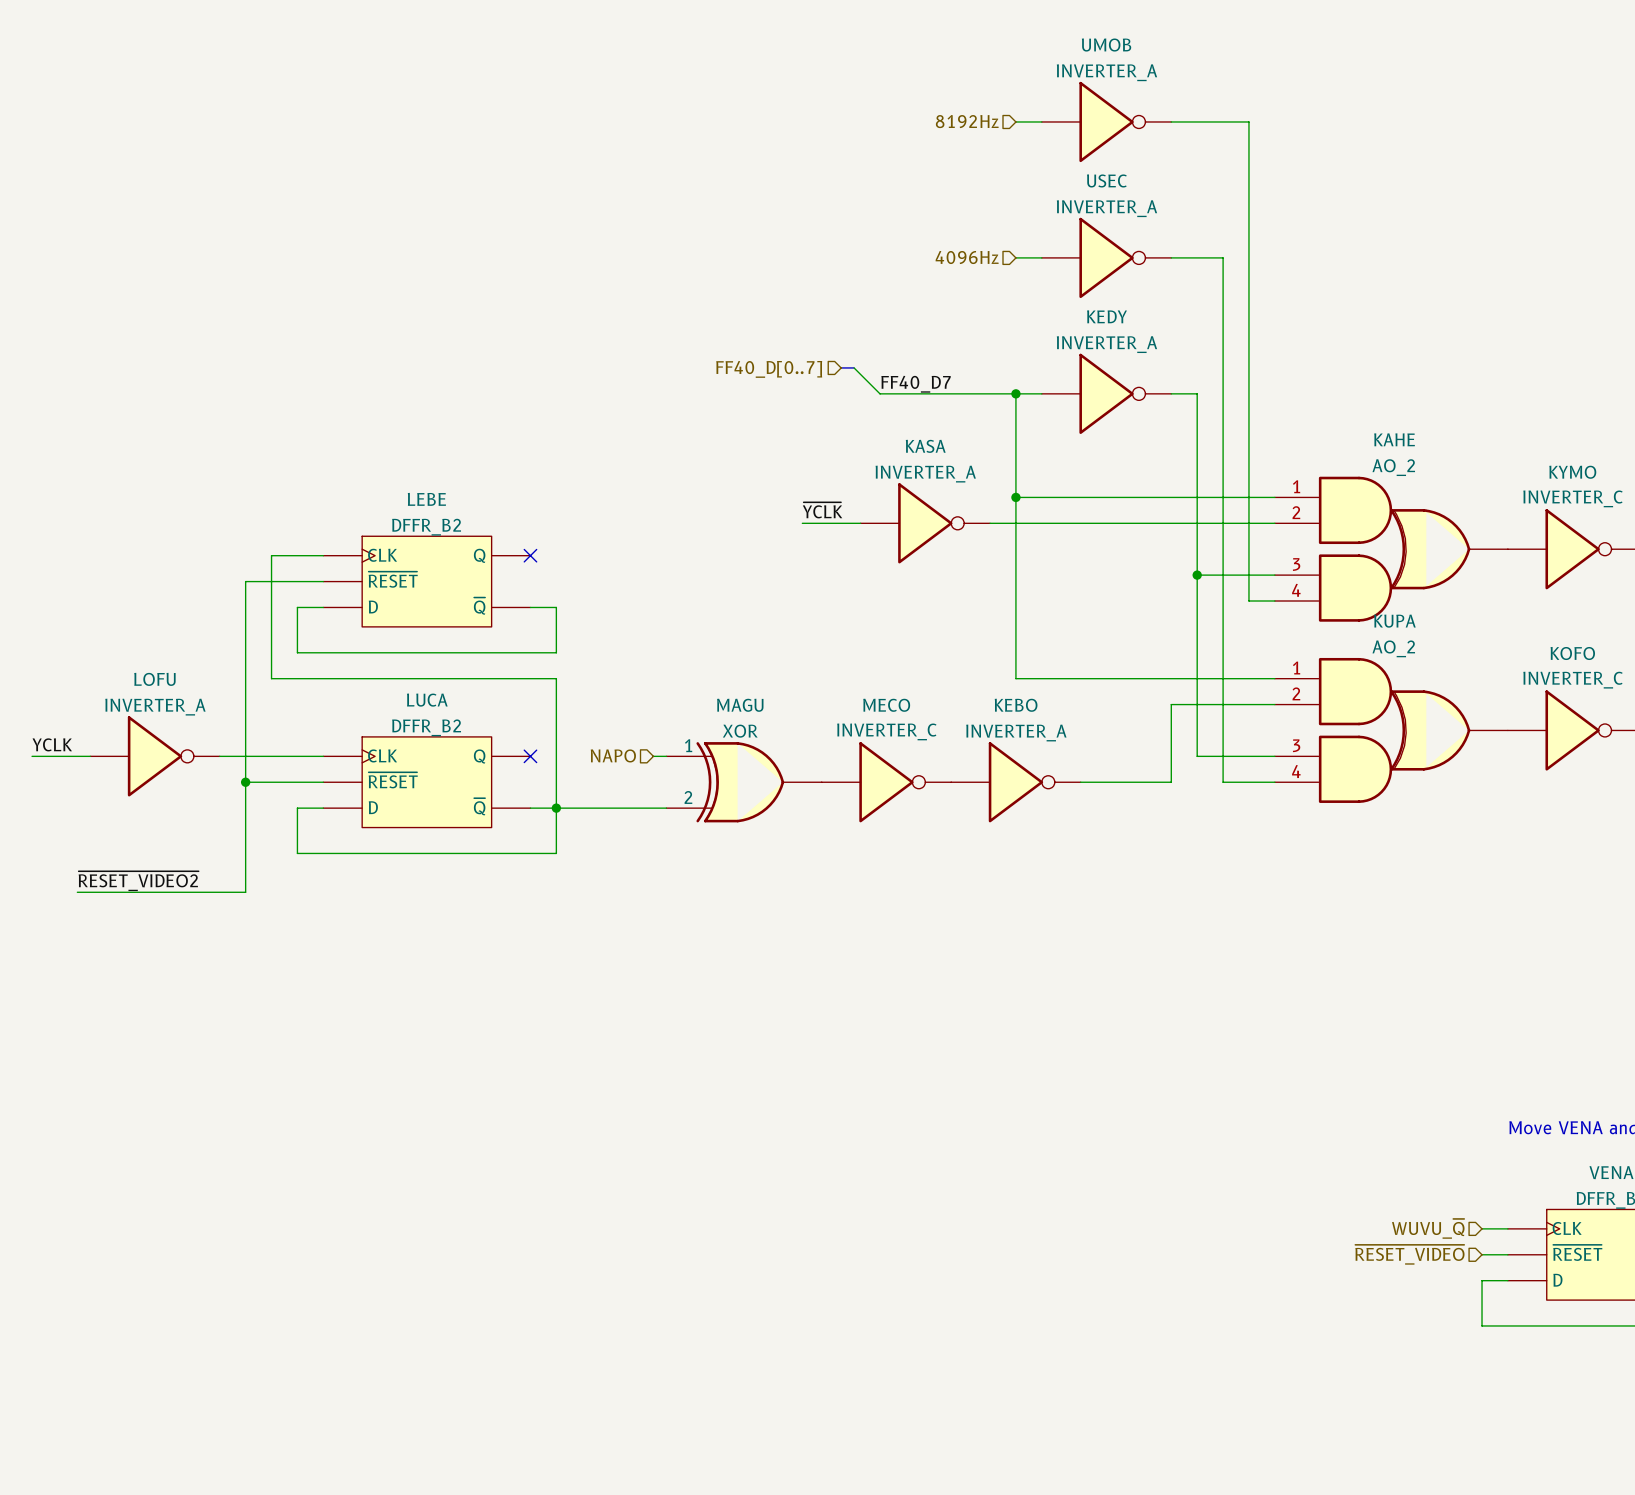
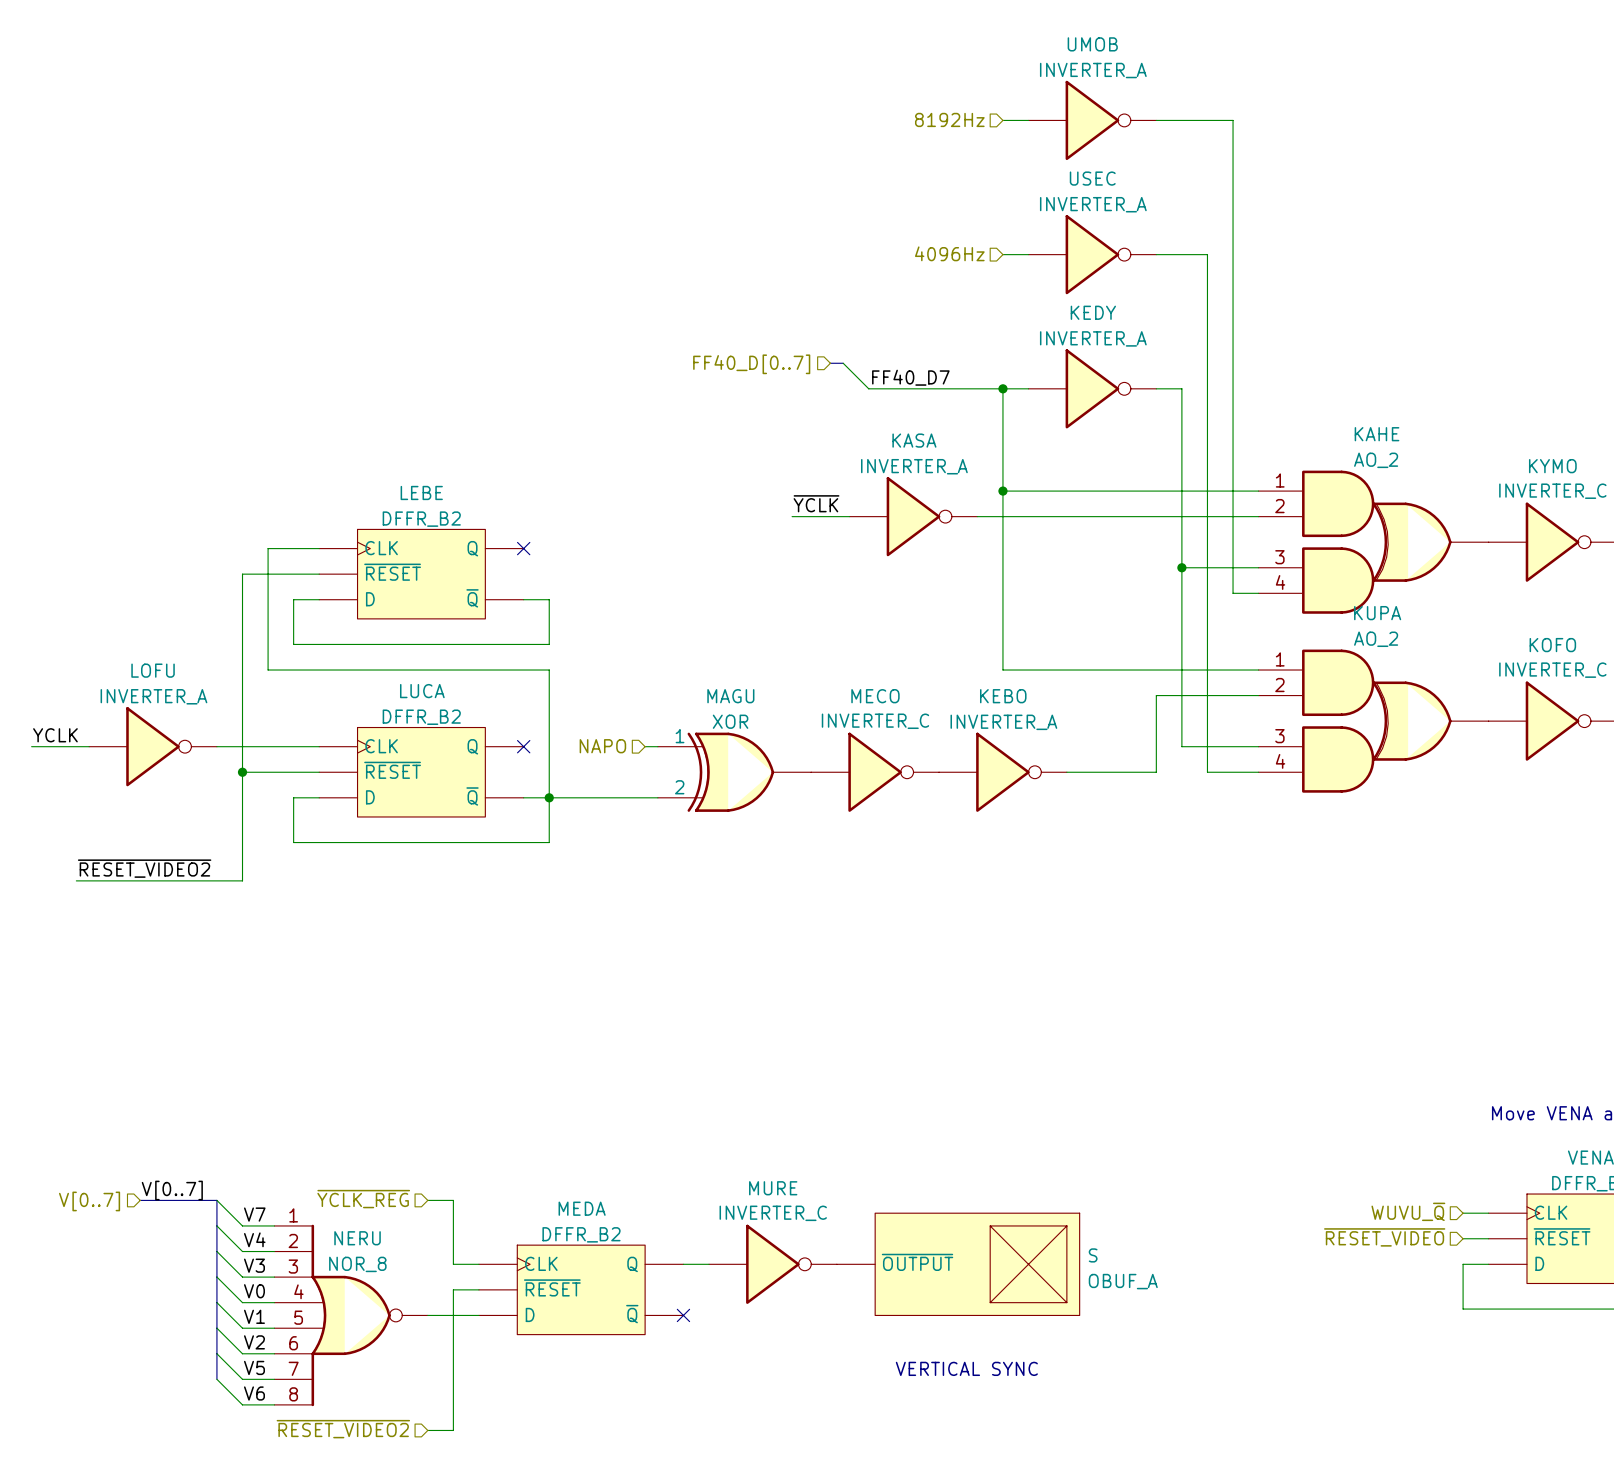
label: none -> V[0..7] (172, 1190)
bus: none -> (140, 1200) (216, 1200) (216, 1379)
wire: none -> (216, 1200) (242, 1225) (274, 1225)
hierarchical label: none -> ~{YCLK_REG} (363, 1199)
wire: none -> (427, 1200) (453, 1200) (453, 1264) (478, 1264)
hierarchical label: none -> V[0..7] (89, 1201)
label: none -> V7 (254, 1214)
wire: none -> (216, 1225) (242, 1251)
label: none -> V4 (254, 1239)
wire: none -> (216, 1251) (242, 1277) (274, 1277)
wire: none -> (242, 1251) (274, 1251)
wire: none -> (683, 1264) (709, 1264)
MURE: none -> INVERTER_C (772, 1264)
S: none -> OBUF_A (958, 1264)
label: none -> V3 (254, 1265)
wire: none -> (216, 1277) (242, 1302) (274, 1302)
wire: none -> (478, 1289) (453, 1289) (453, 1430) (427, 1430)
MEDA: none -> DFFR_B2 (581, 1289)
label: none -> V0 (254, 1291)
wire: none -> (216, 1302) (242, 1328) (274, 1328)
NERU: none -> NOR_8 (351, 1315)
wire: none -> (427, 1315) (478, 1315)
no-connect mark: none -> (683, 1315)
label: none -> V1 (254, 1316)
wire: none -> (216, 1328) (242, 1353)
label: none -> V2 (254, 1342)
wire: none -> (216, 1353) (242, 1379) (274, 1379)
wire: none -> (242, 1353) (274, 1353)
label: none -> V5 (254, 1367)
text: none -> VERTICAL SYNC (966, 1368)
wire: none -> (216, 1379) (242, 1404) (274, 1404)
label: none -> V6 (254, 1393)
hierarchical label: none -> ~{RESET_VIDEO2} (343, 1429)

